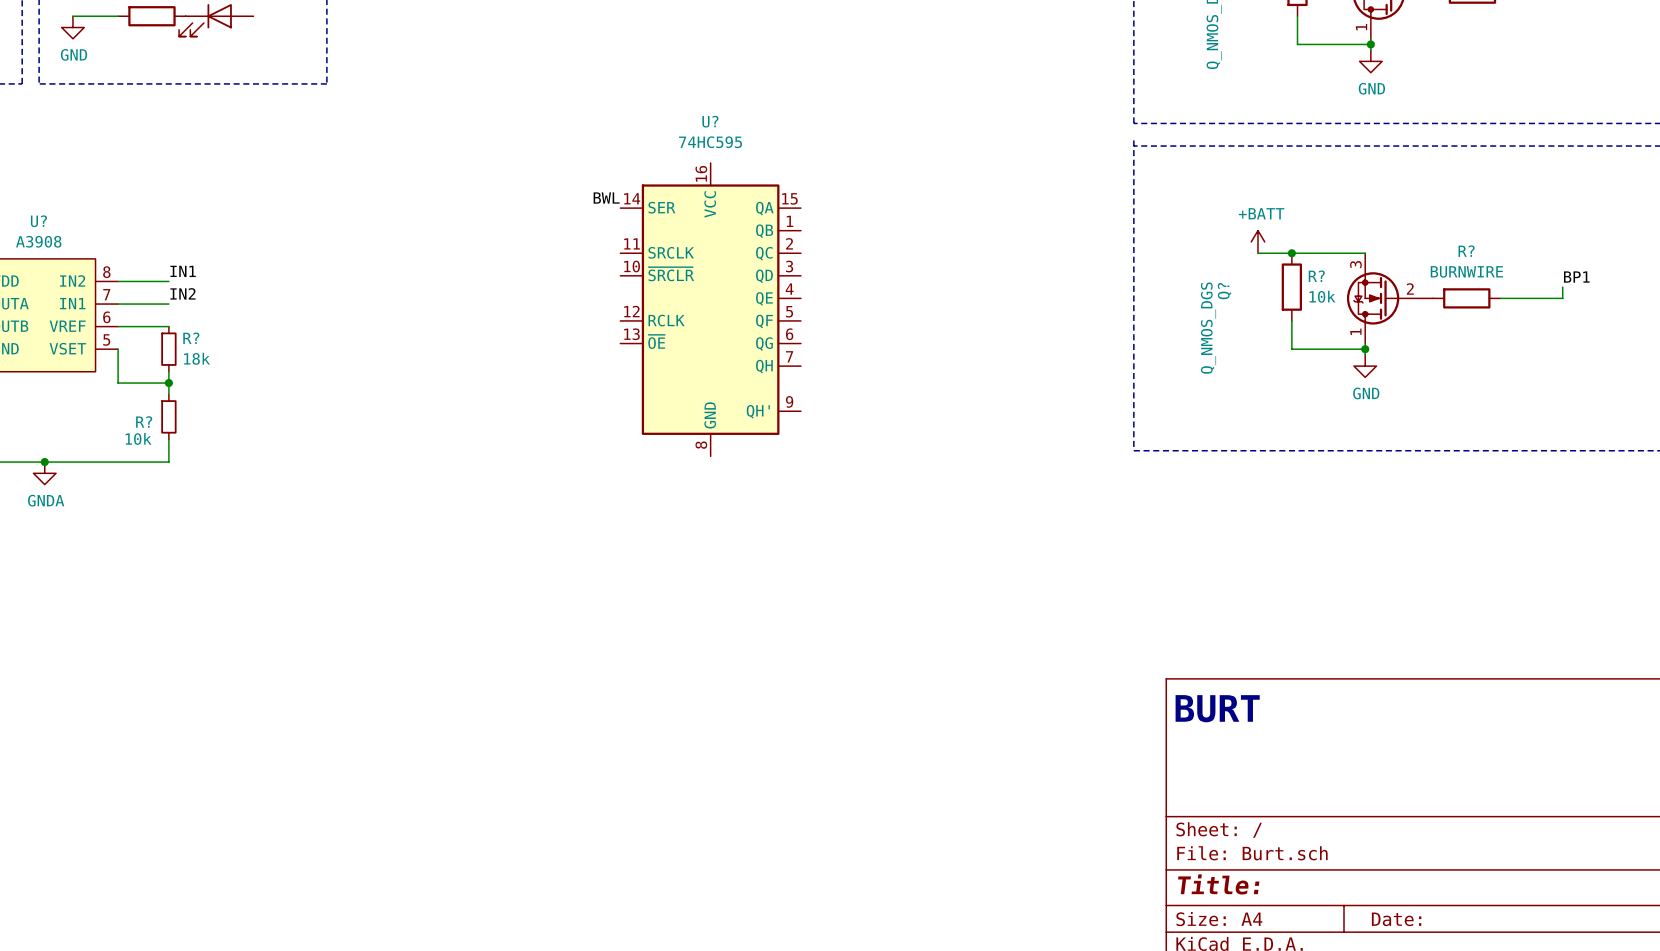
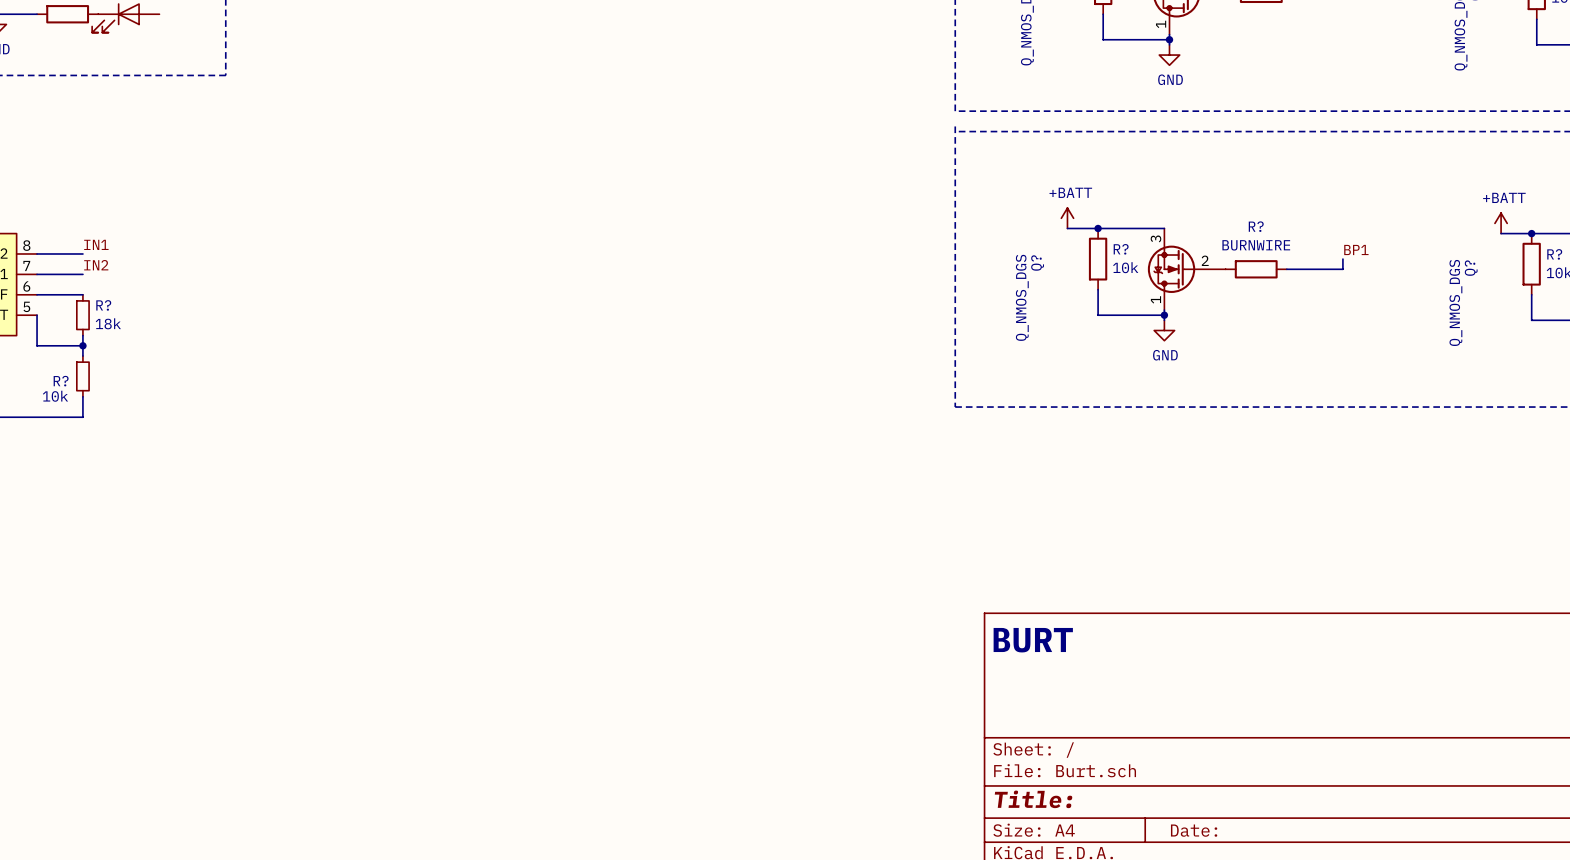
label: BWL (606, 198) -> none
U?: 74HC595 (710, 309) -> none

